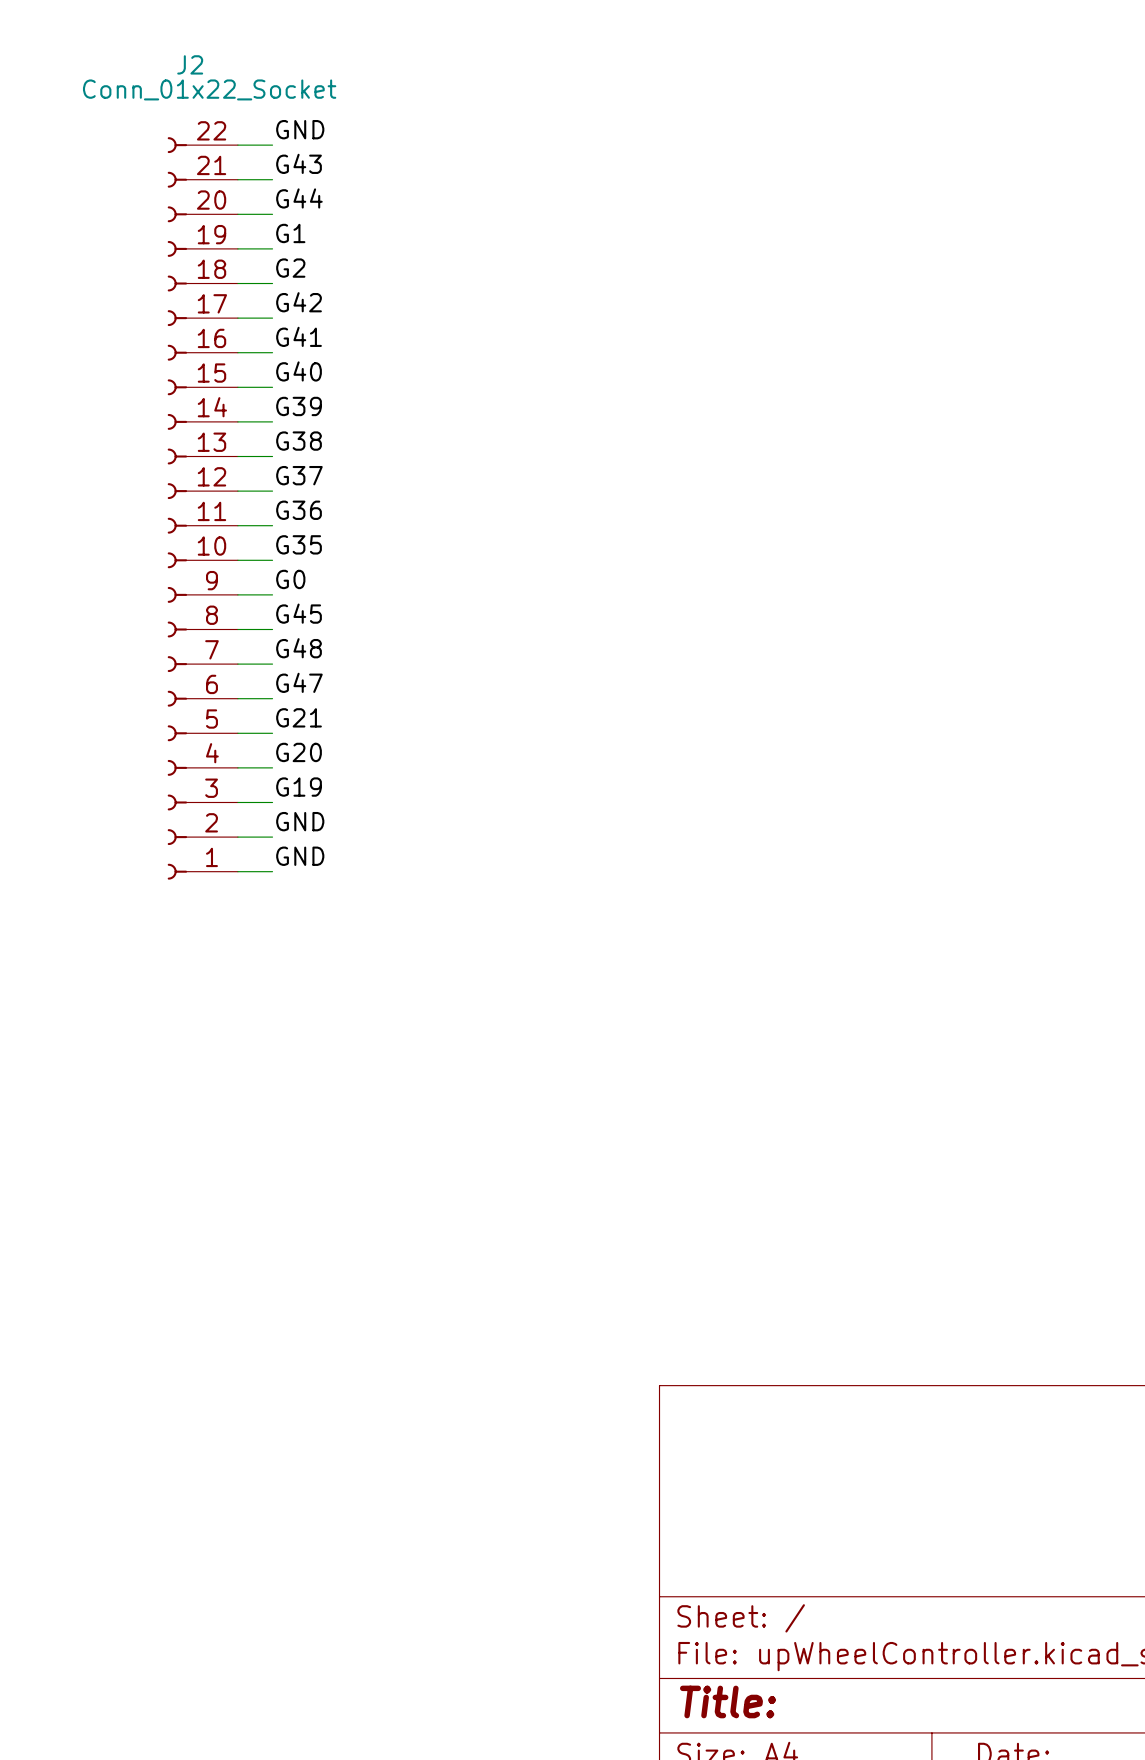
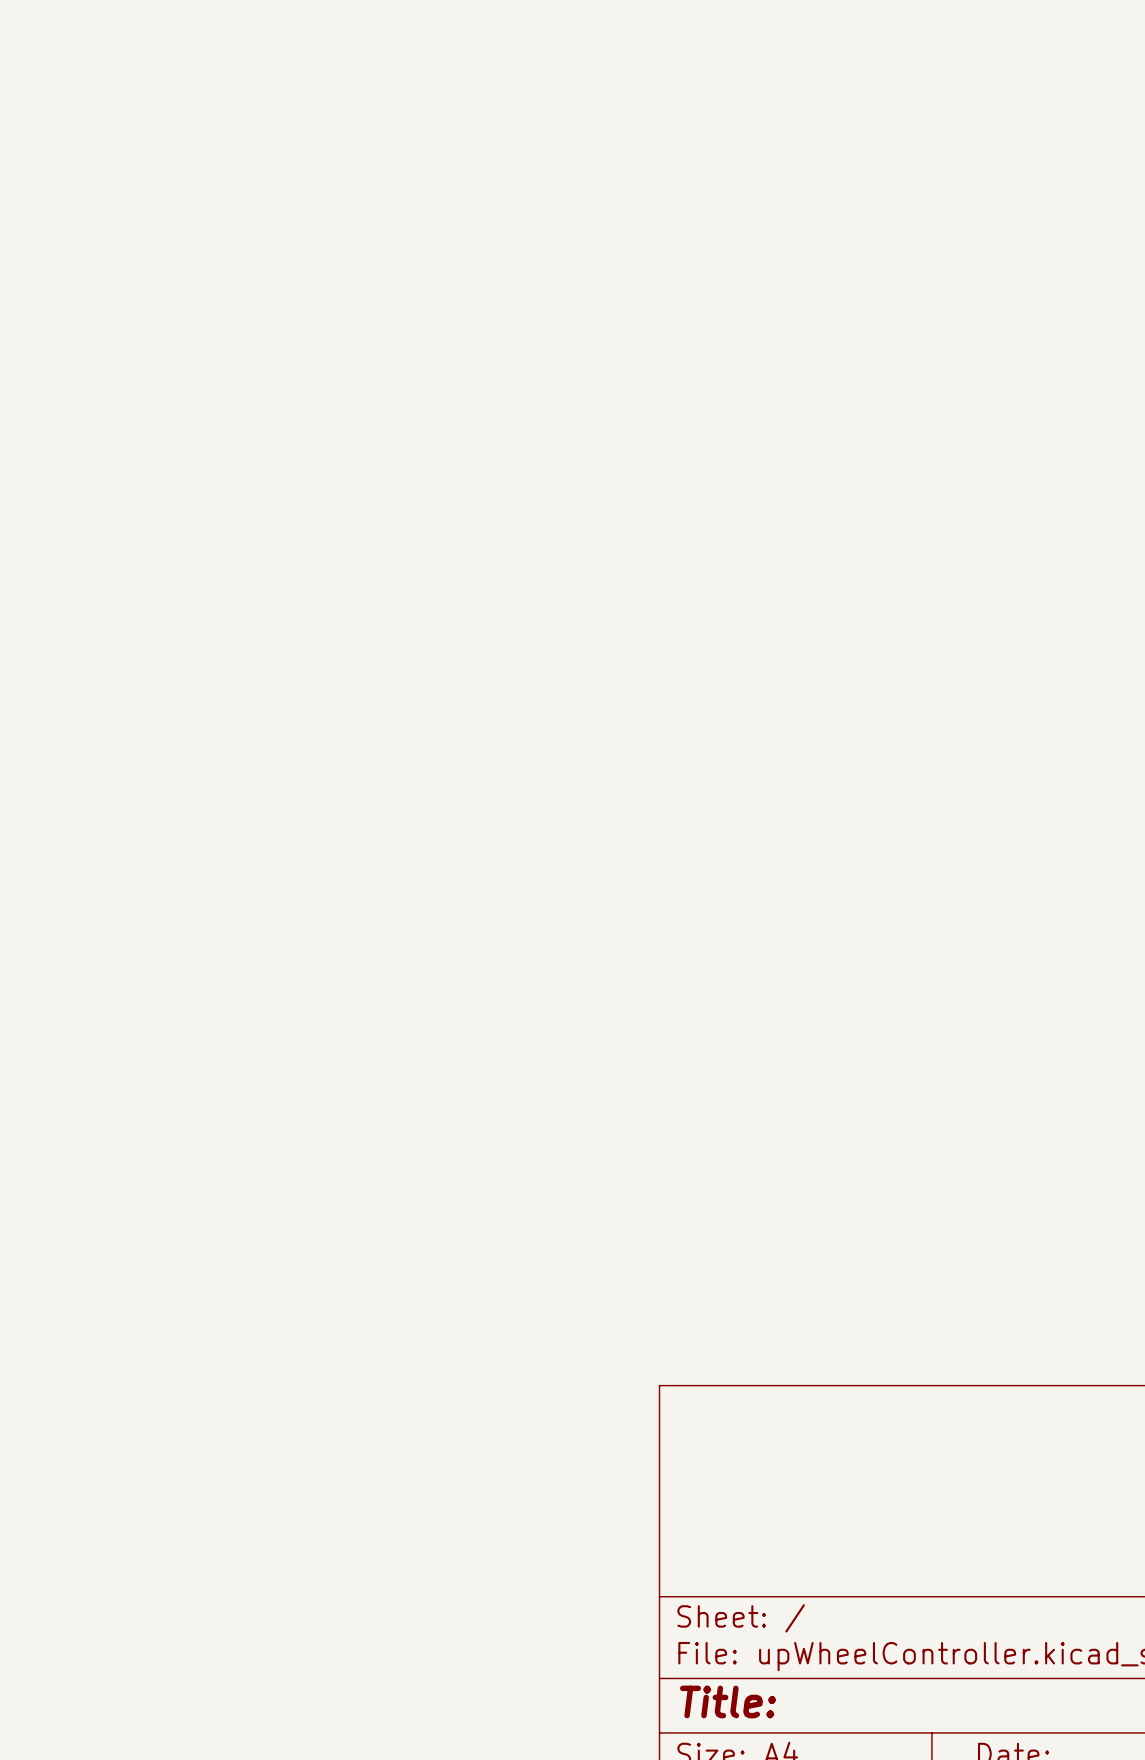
label: GND (300, 129) -> none
wire: (237, 145) (272, 145) -> none
label: G43 (299, 163) -> none
wire: (237, 179) (272, 179) -> none
label: G44 (299, 198) -> none
wire: (237, 214) (272, 214) -> none
label: G1 (290, 233) -> none
wire: (237, 248) (272, 248) -> none
label: G2 (290, 268) -> none
wire: (237, 283) (272, 283) -> none
label: G42 (299, 302) -> none
wire: (237, 318) (272, 318) -> none
label: G41 (299, 336) -> none
wire: (237, 352) (272, 352) -> none
label: G40 (299, 371) -> none
wire: (237, 387) (272, 387) -> none
label: G39 (299, 406) -> none
wire: (237, 421) (272, 421) -> none
label: G38 (299, 441) -> none
wire: (237, 456) (272, 456) -> none
label: G37 (299, 475) -> none
wire: (237, 491) (272, 491) -> none
J2: Conn_01x22_Socket (202, 508) -> none
label: G36 (299, 510) -> none
wire: (237, 525) (272, 525) -> none
label: G35 (299, 544) -> none
wire: (237, 560) (272, 560) -> none
label: G0 (290, 579) -> none
wire: (237, 594) (272, 594) -> none
label: G45 (299, 613) -> none
wire: (237, 629) (272, 629) -> none
label: G48 (299, 648) -> none
wire: (237, 664) (272, 664) -> none
label: G47 (299, 682) -> none
wire: (237, 698) (272, 698) -> none
label: G21 (299, 717) -> none
wire: (237, 733) (272, 733) -> none
label: G20 (299, 752) -> none
wire: (237, 767) (272, 767) -> none
label: G19 (299, 787) -> none
wire: (237, 802) (272, 802) -> none
label: GND (300, 821) -> none
wire: (237, 837) (272, 837) -> none
label: GND (300, 856) -> none
wire: (237, 871) (272, 871) -> none

